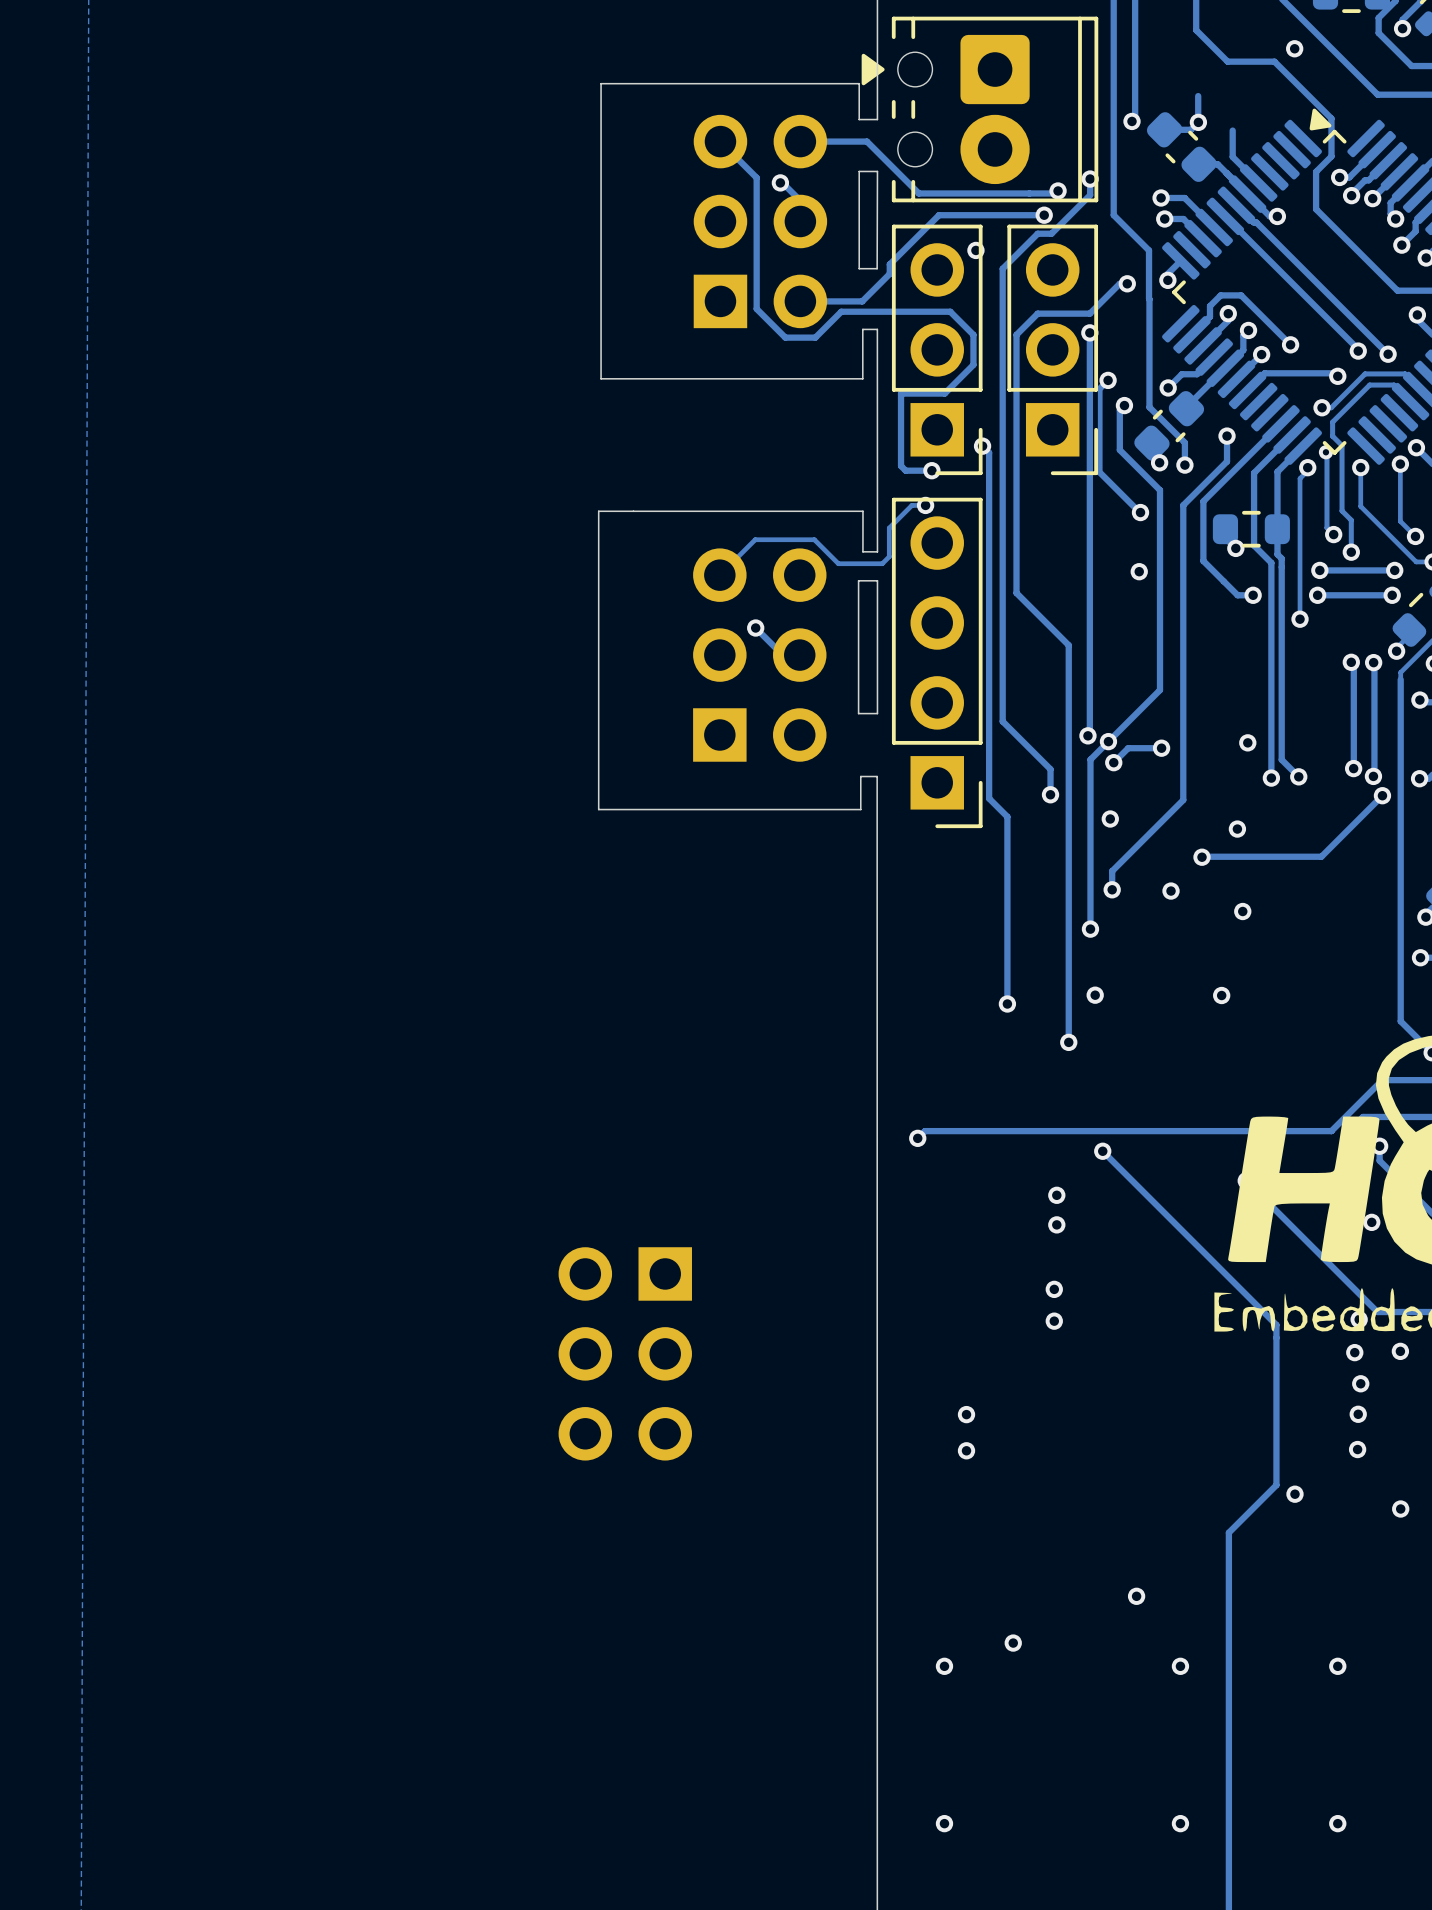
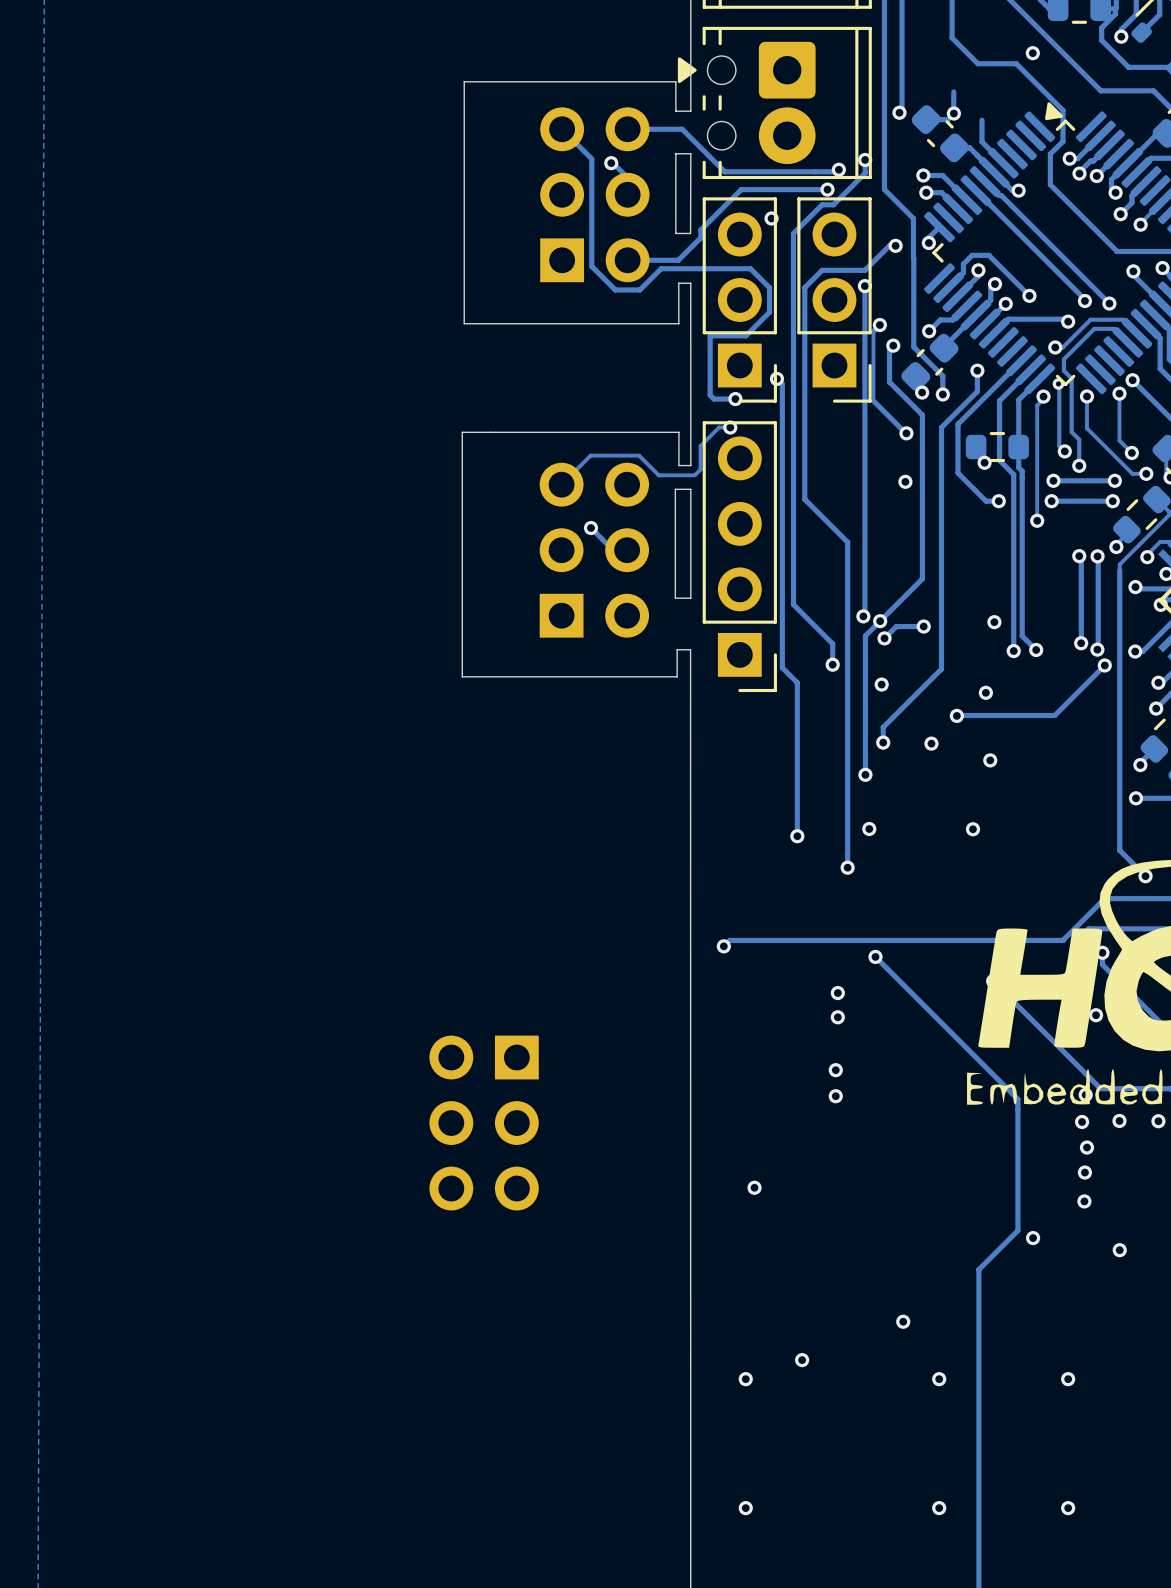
via: (966, 1414) -> none
via: none -> (754, 1187)
via: (966, 1450) -> none

